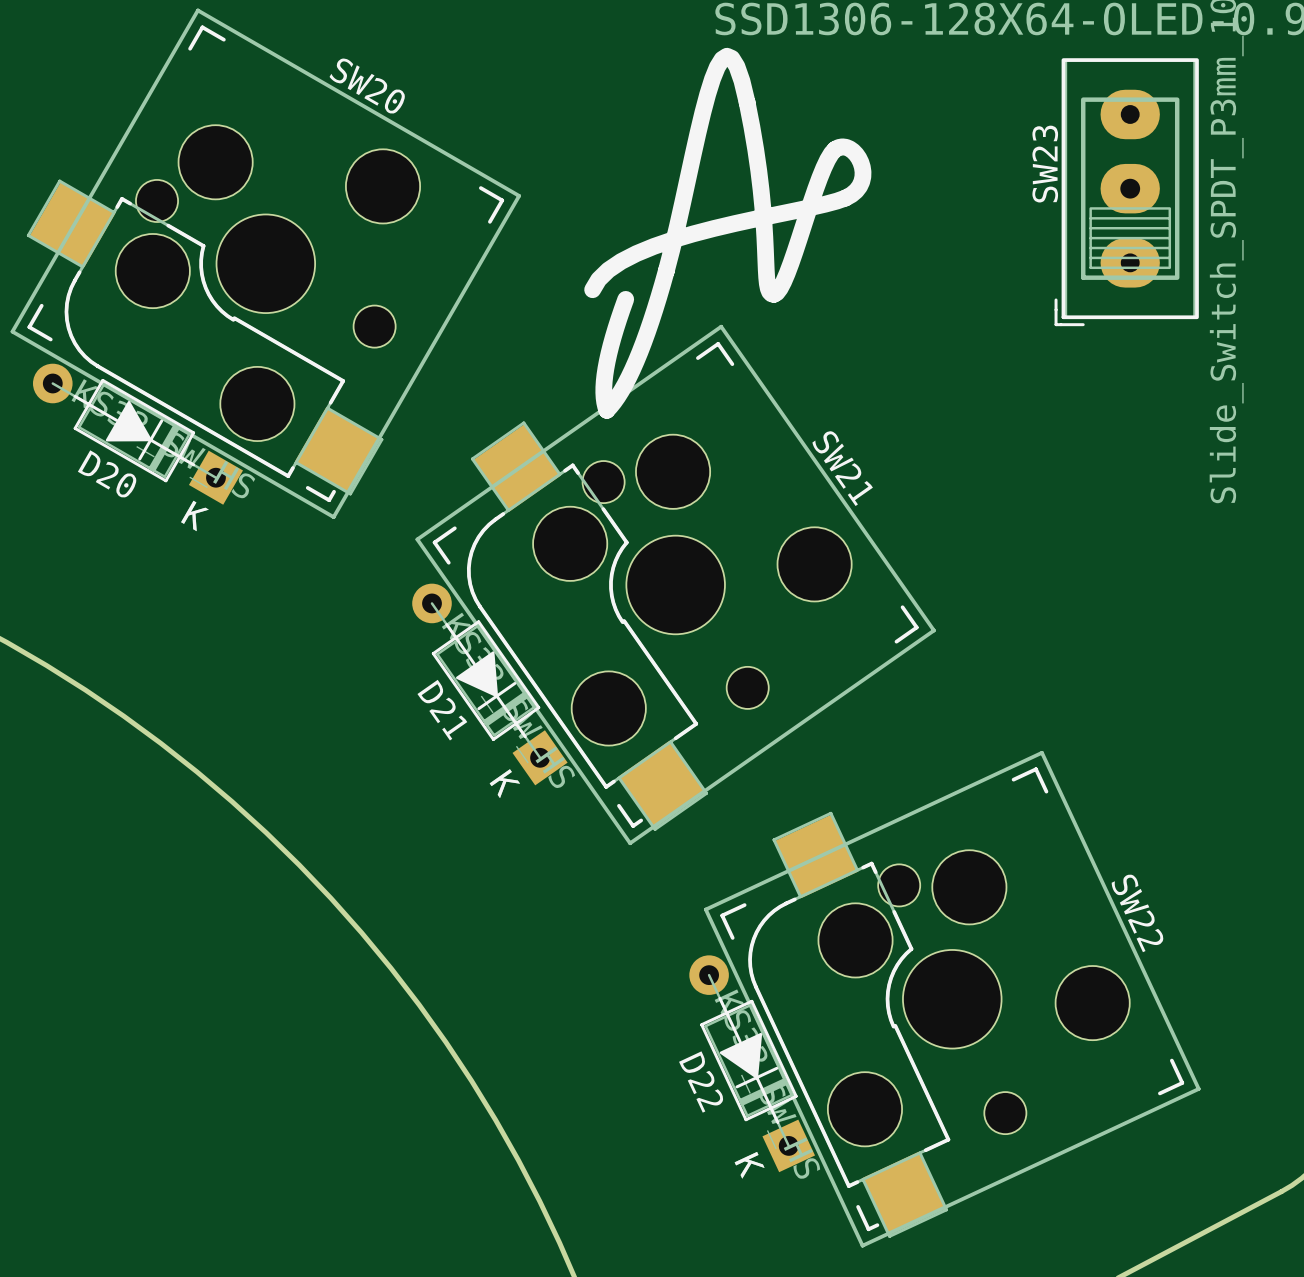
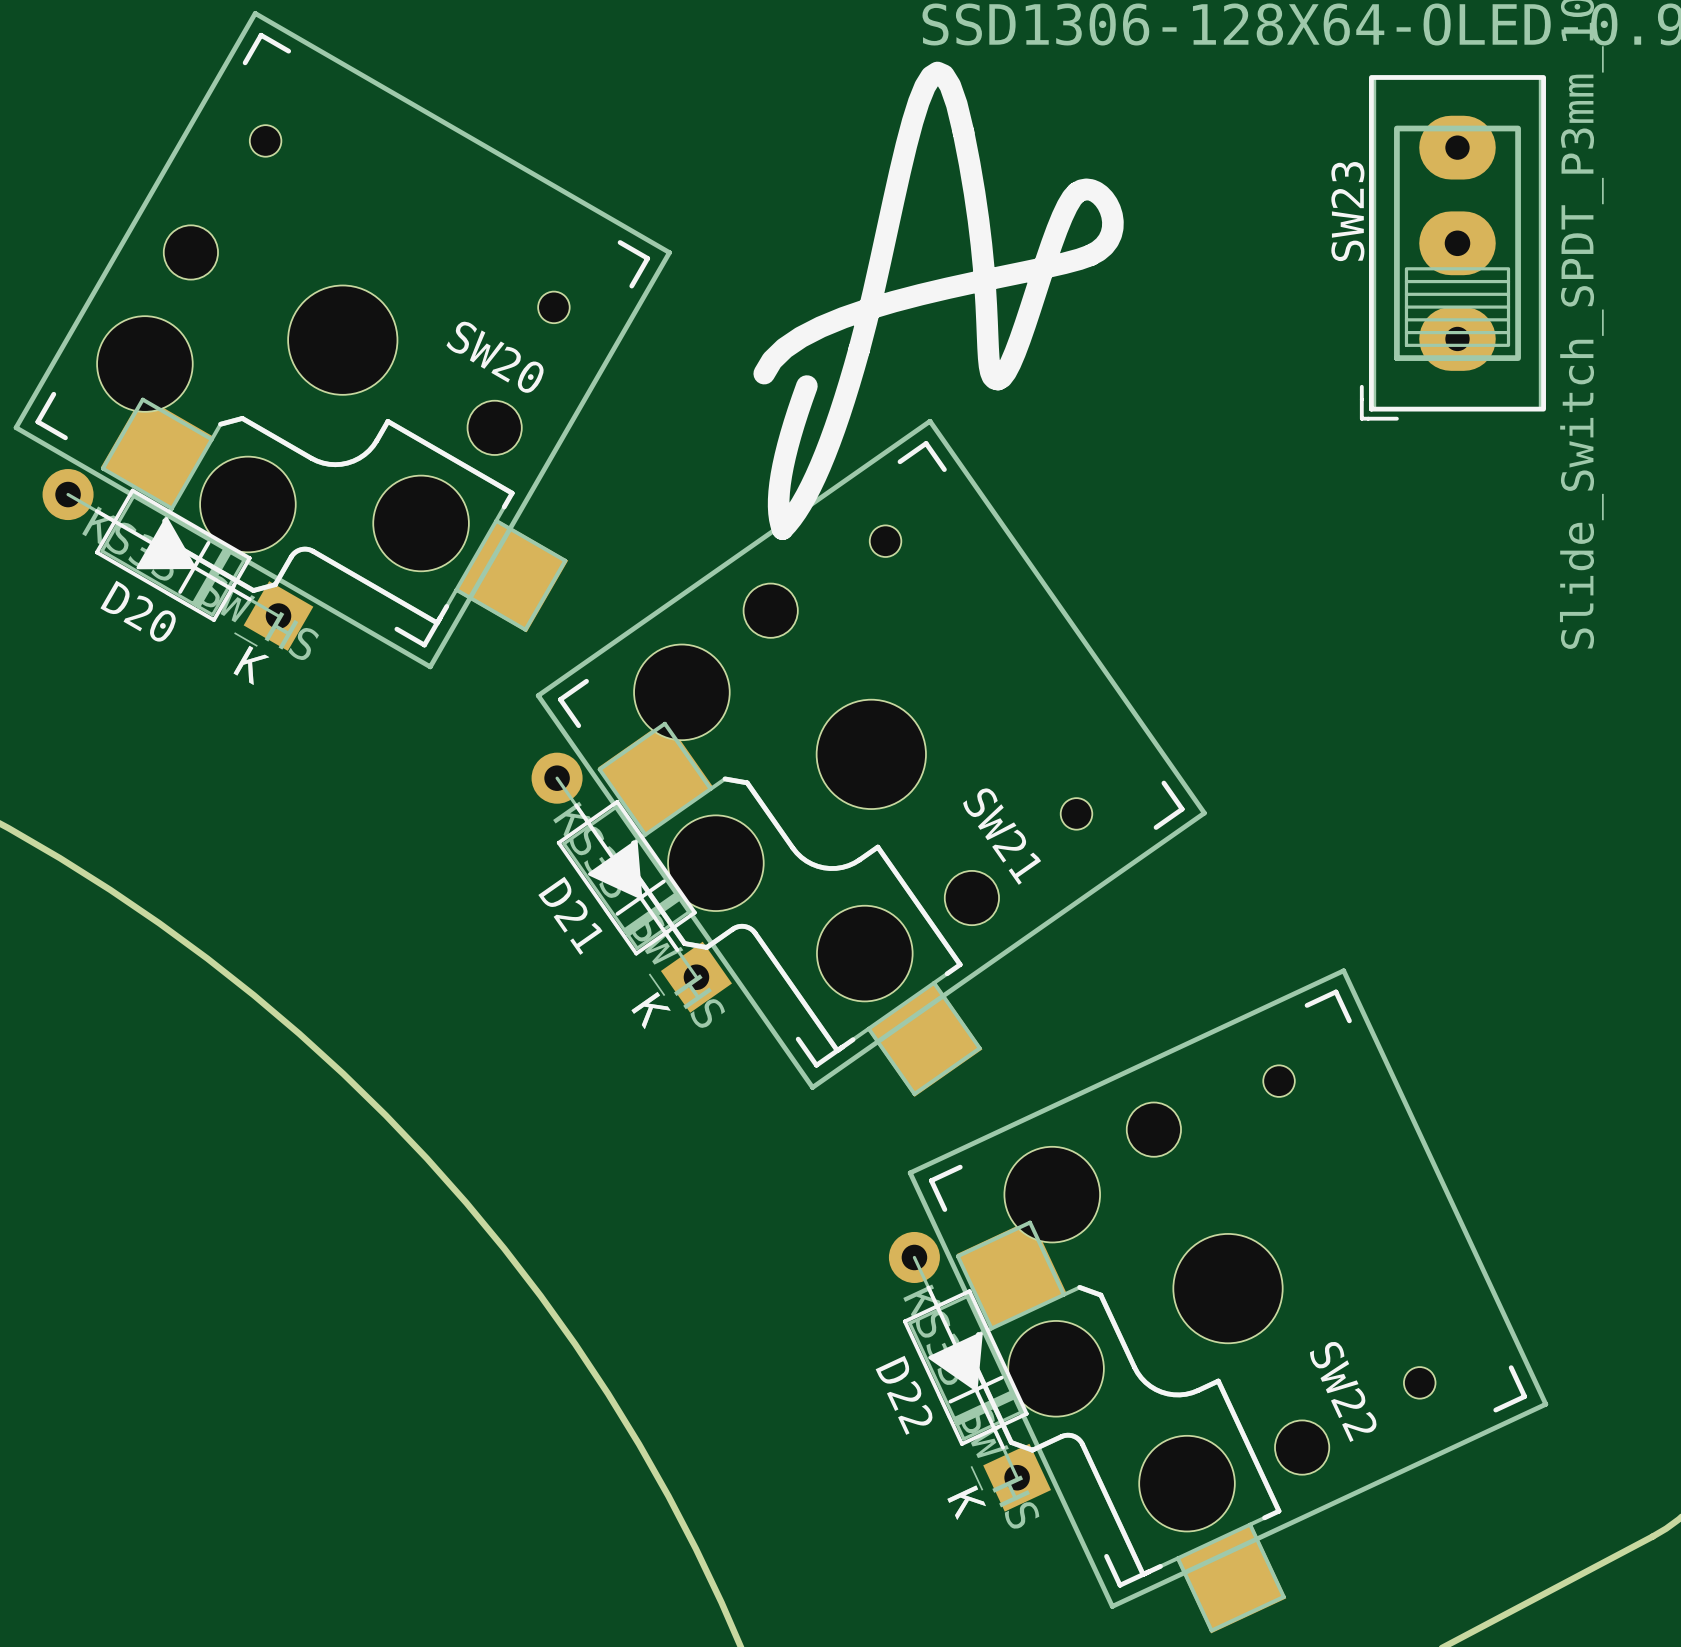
SW20 footprint: [10, 8, 522, 519] -> [13, 11, 672, 670]
SW20 name position: SW20 (367, 86) -> SW20 (495, 357)
SW21 footprint: [415, 324, 936, 846] -> [535, 418, 1207, 1097]
SW21 name position: SW21 (842, 468) -> SW21 (1002, 836)
SW22 footprint: [703, 750, 1201, 1248] -> [907, 968, 1549, 1634]
SW22 name position: SW22 (1137, 913) -> SW22 (1343, 1391)

